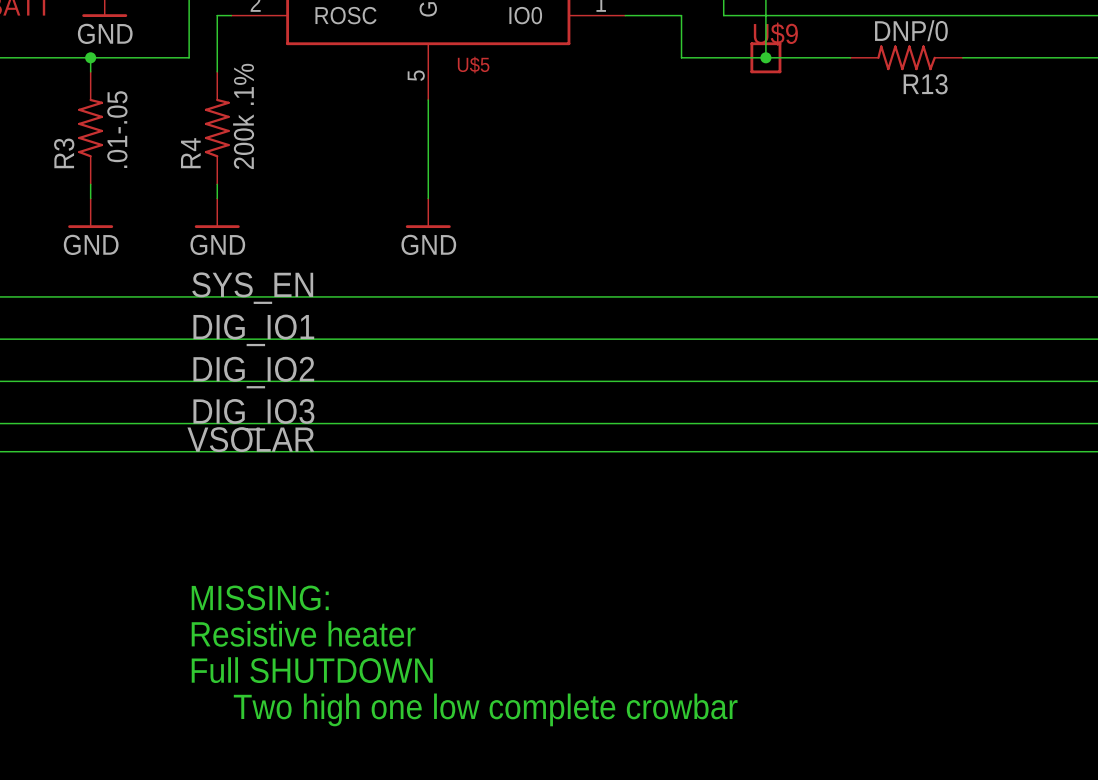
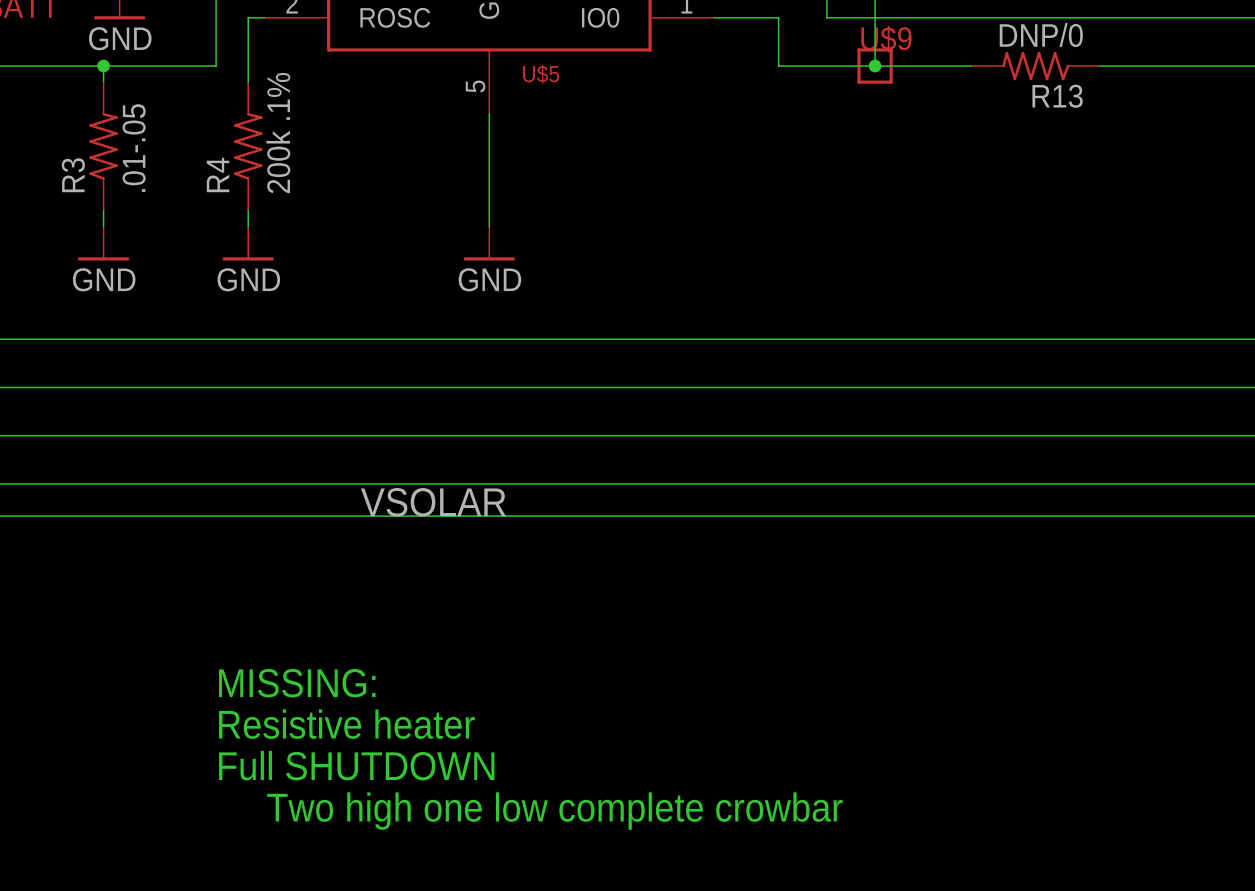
text: SYS_EN (252, 288) -> none
text: DIG_IO1 (253, 330) -> none
text: DIG_IO2 (253, 372) -> none
text: DIG_IO3 (253, 414) -> none
text position: VSOLAR (250, 439) -> VSOLAR (433, 502)

